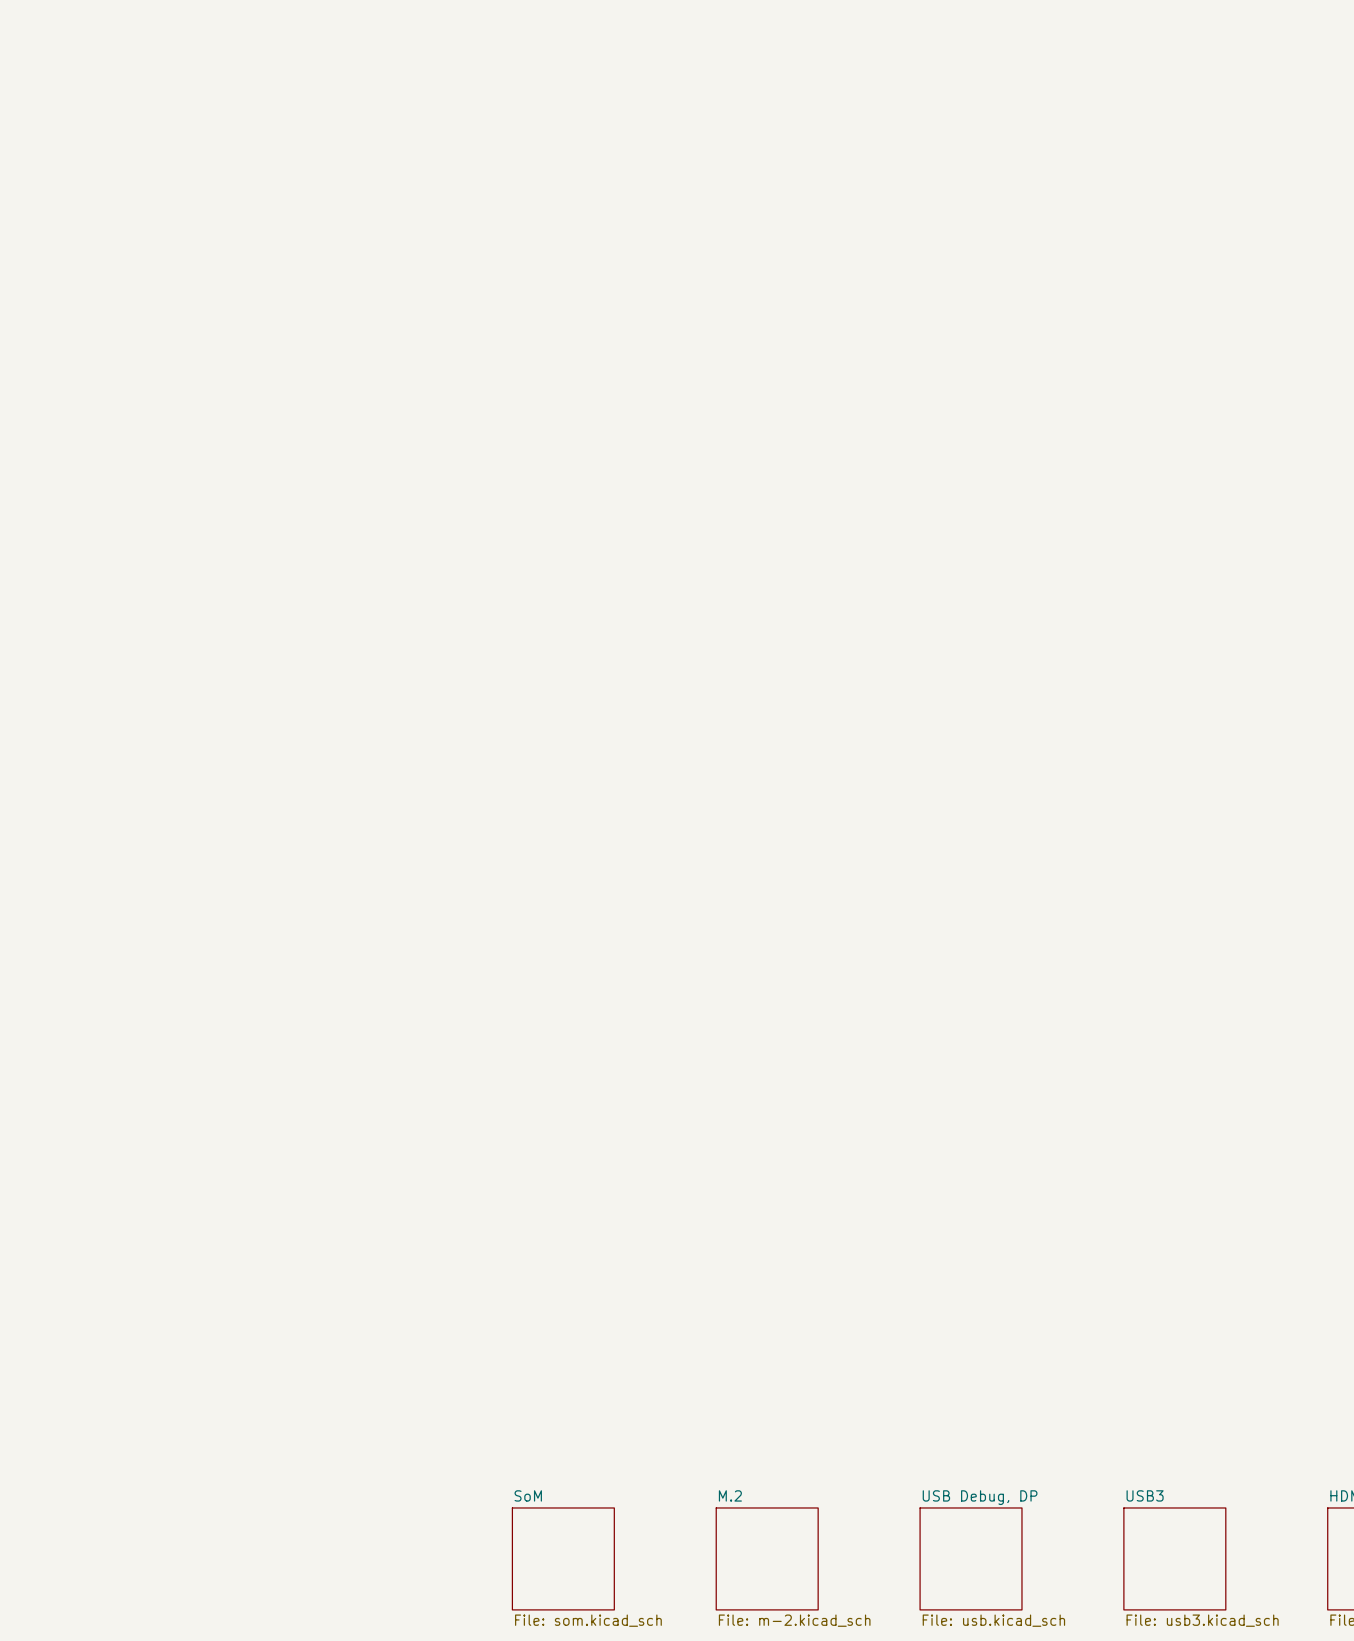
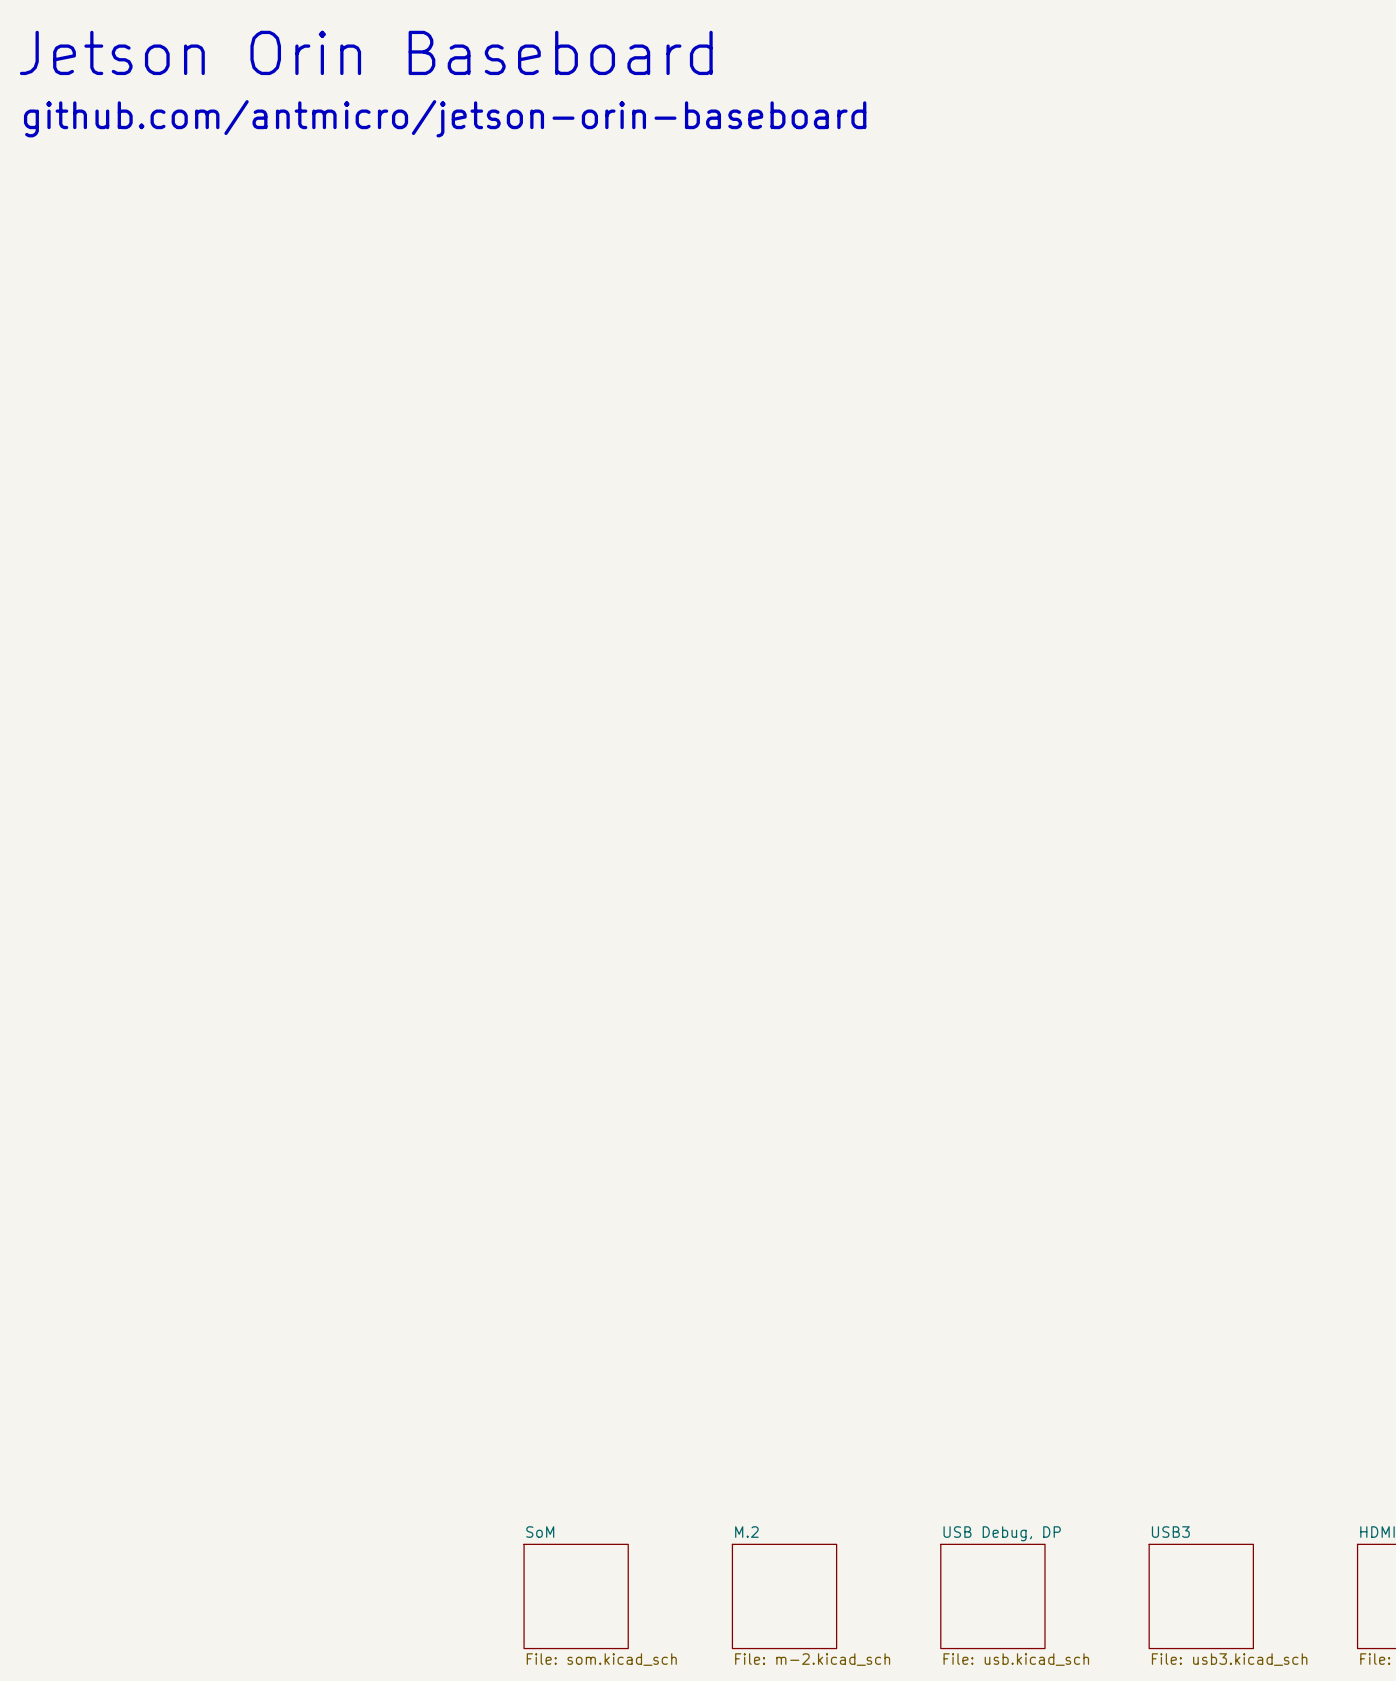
text: none -> Jetson Orin Baseboard (366, 52)
text: none -> github.com/antmicro/jetson-orin-baseboard (445, 118)

